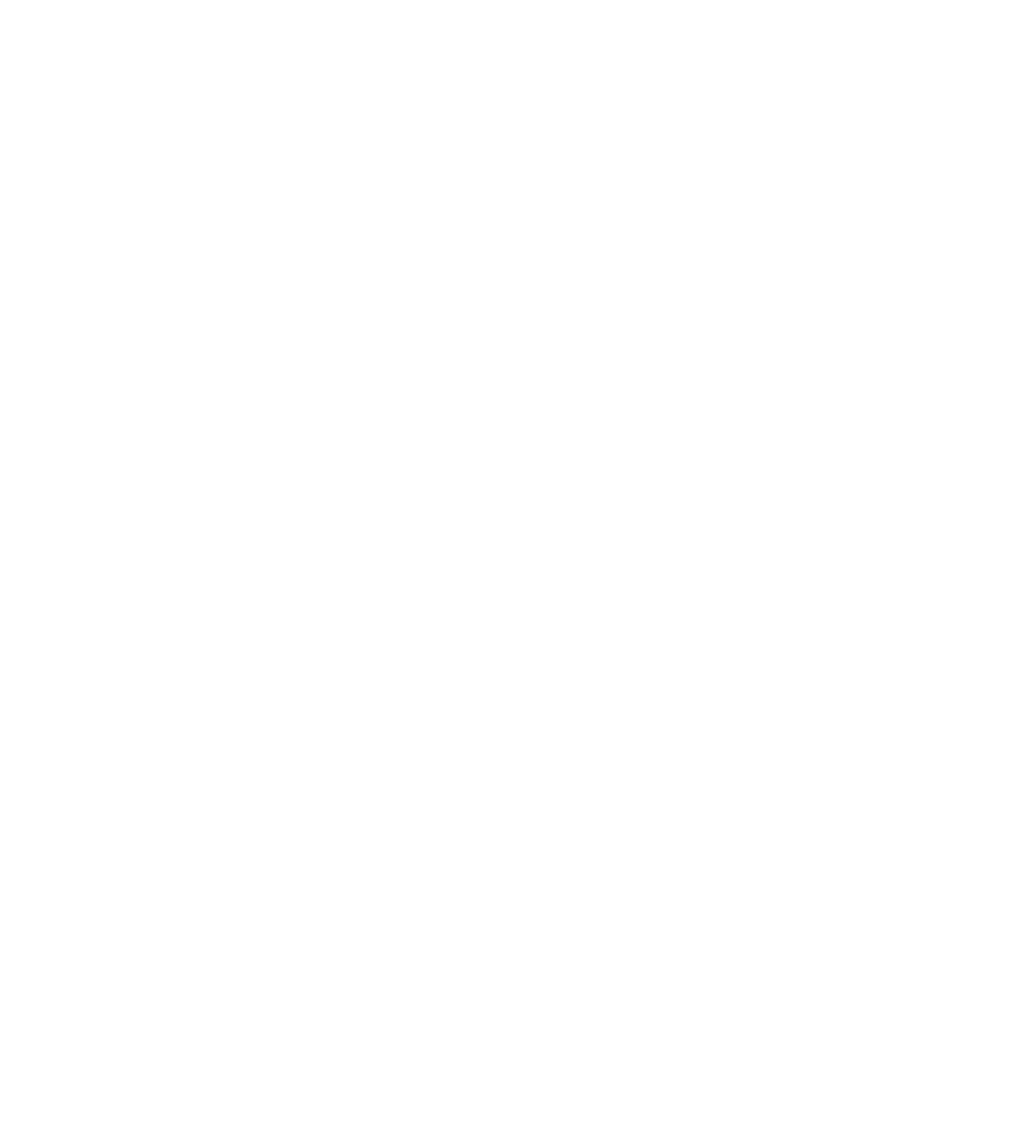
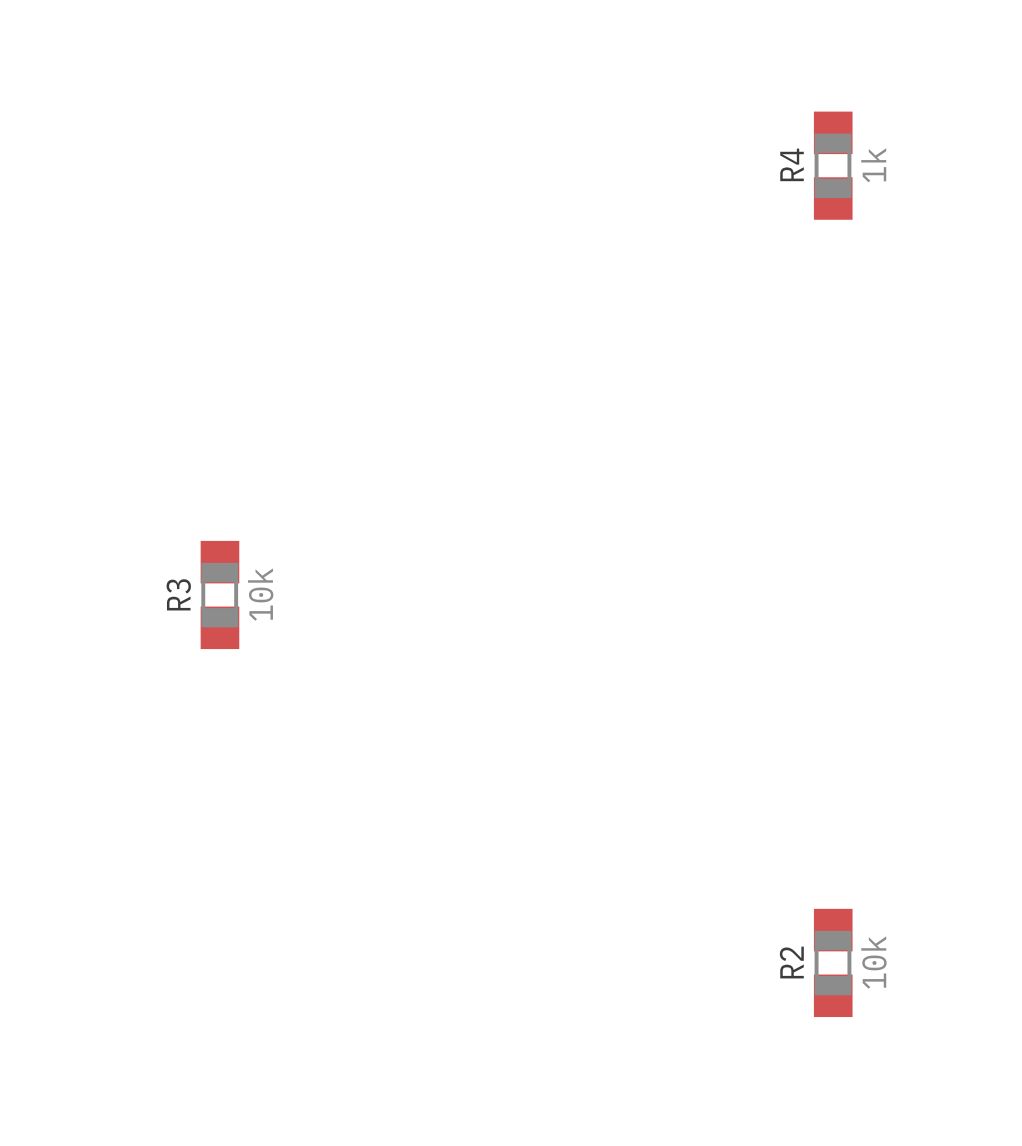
R4: none -> 1k (833, 165)
R3: none -> 10k (219, 594)
R2: none -> 10k (833, 962)

